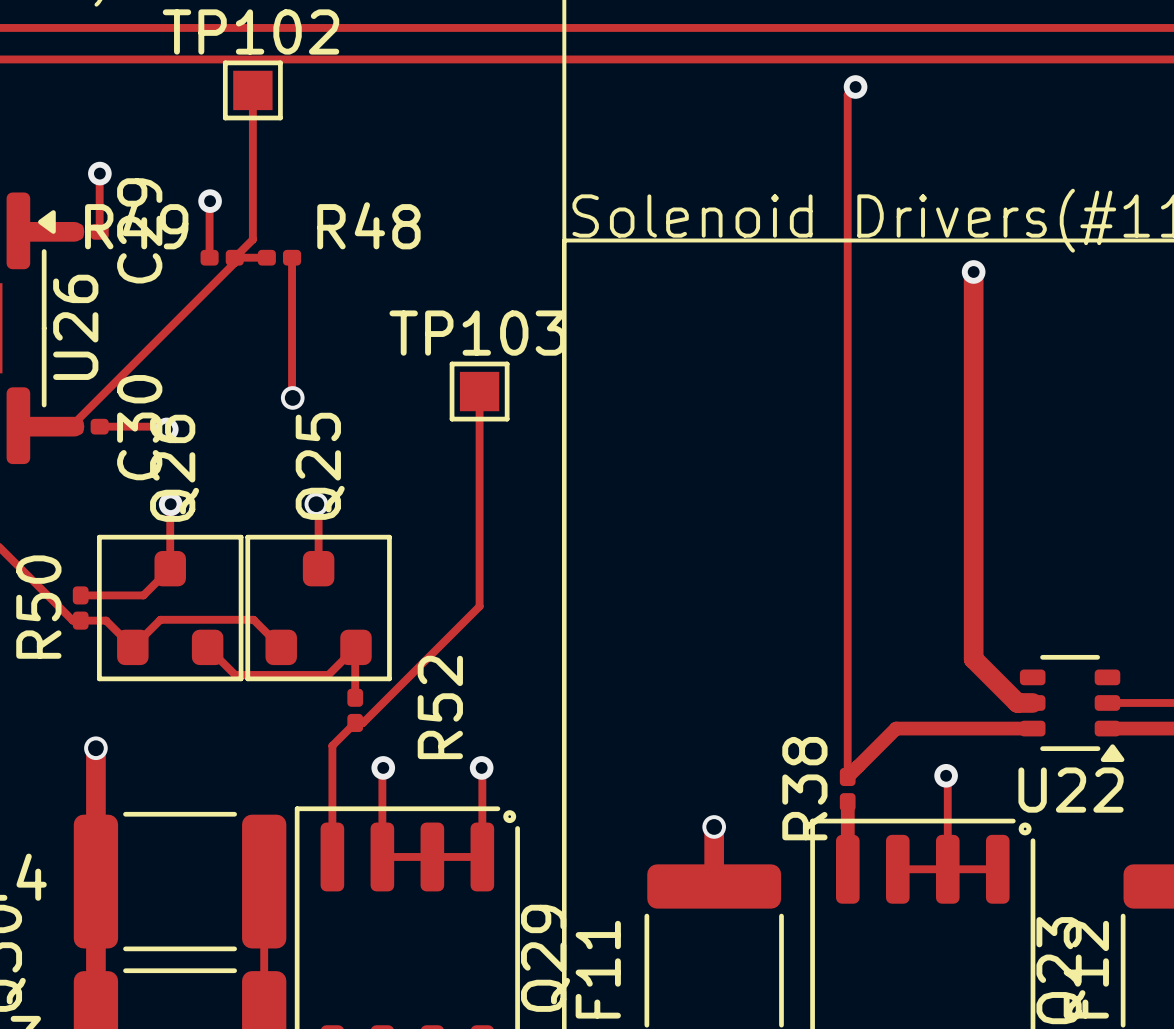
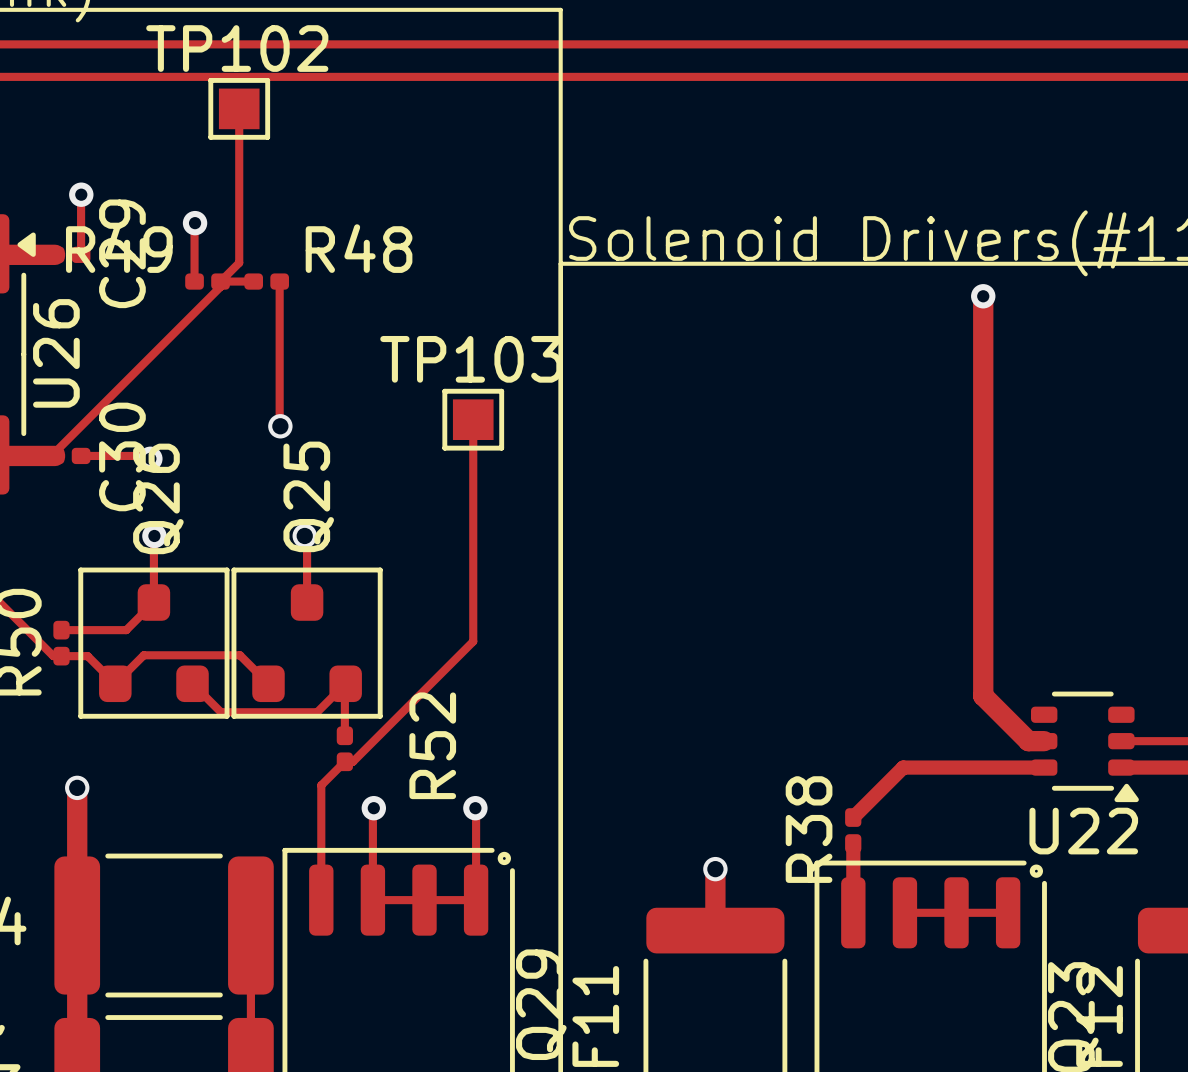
via: (855, 86) -> none
track: (858, 89) (855, 86) (847, 94) (847, 776) -> none
track: (946, 775) (947, 777) (947, 869) -> none
via: (946, 775) -> none

